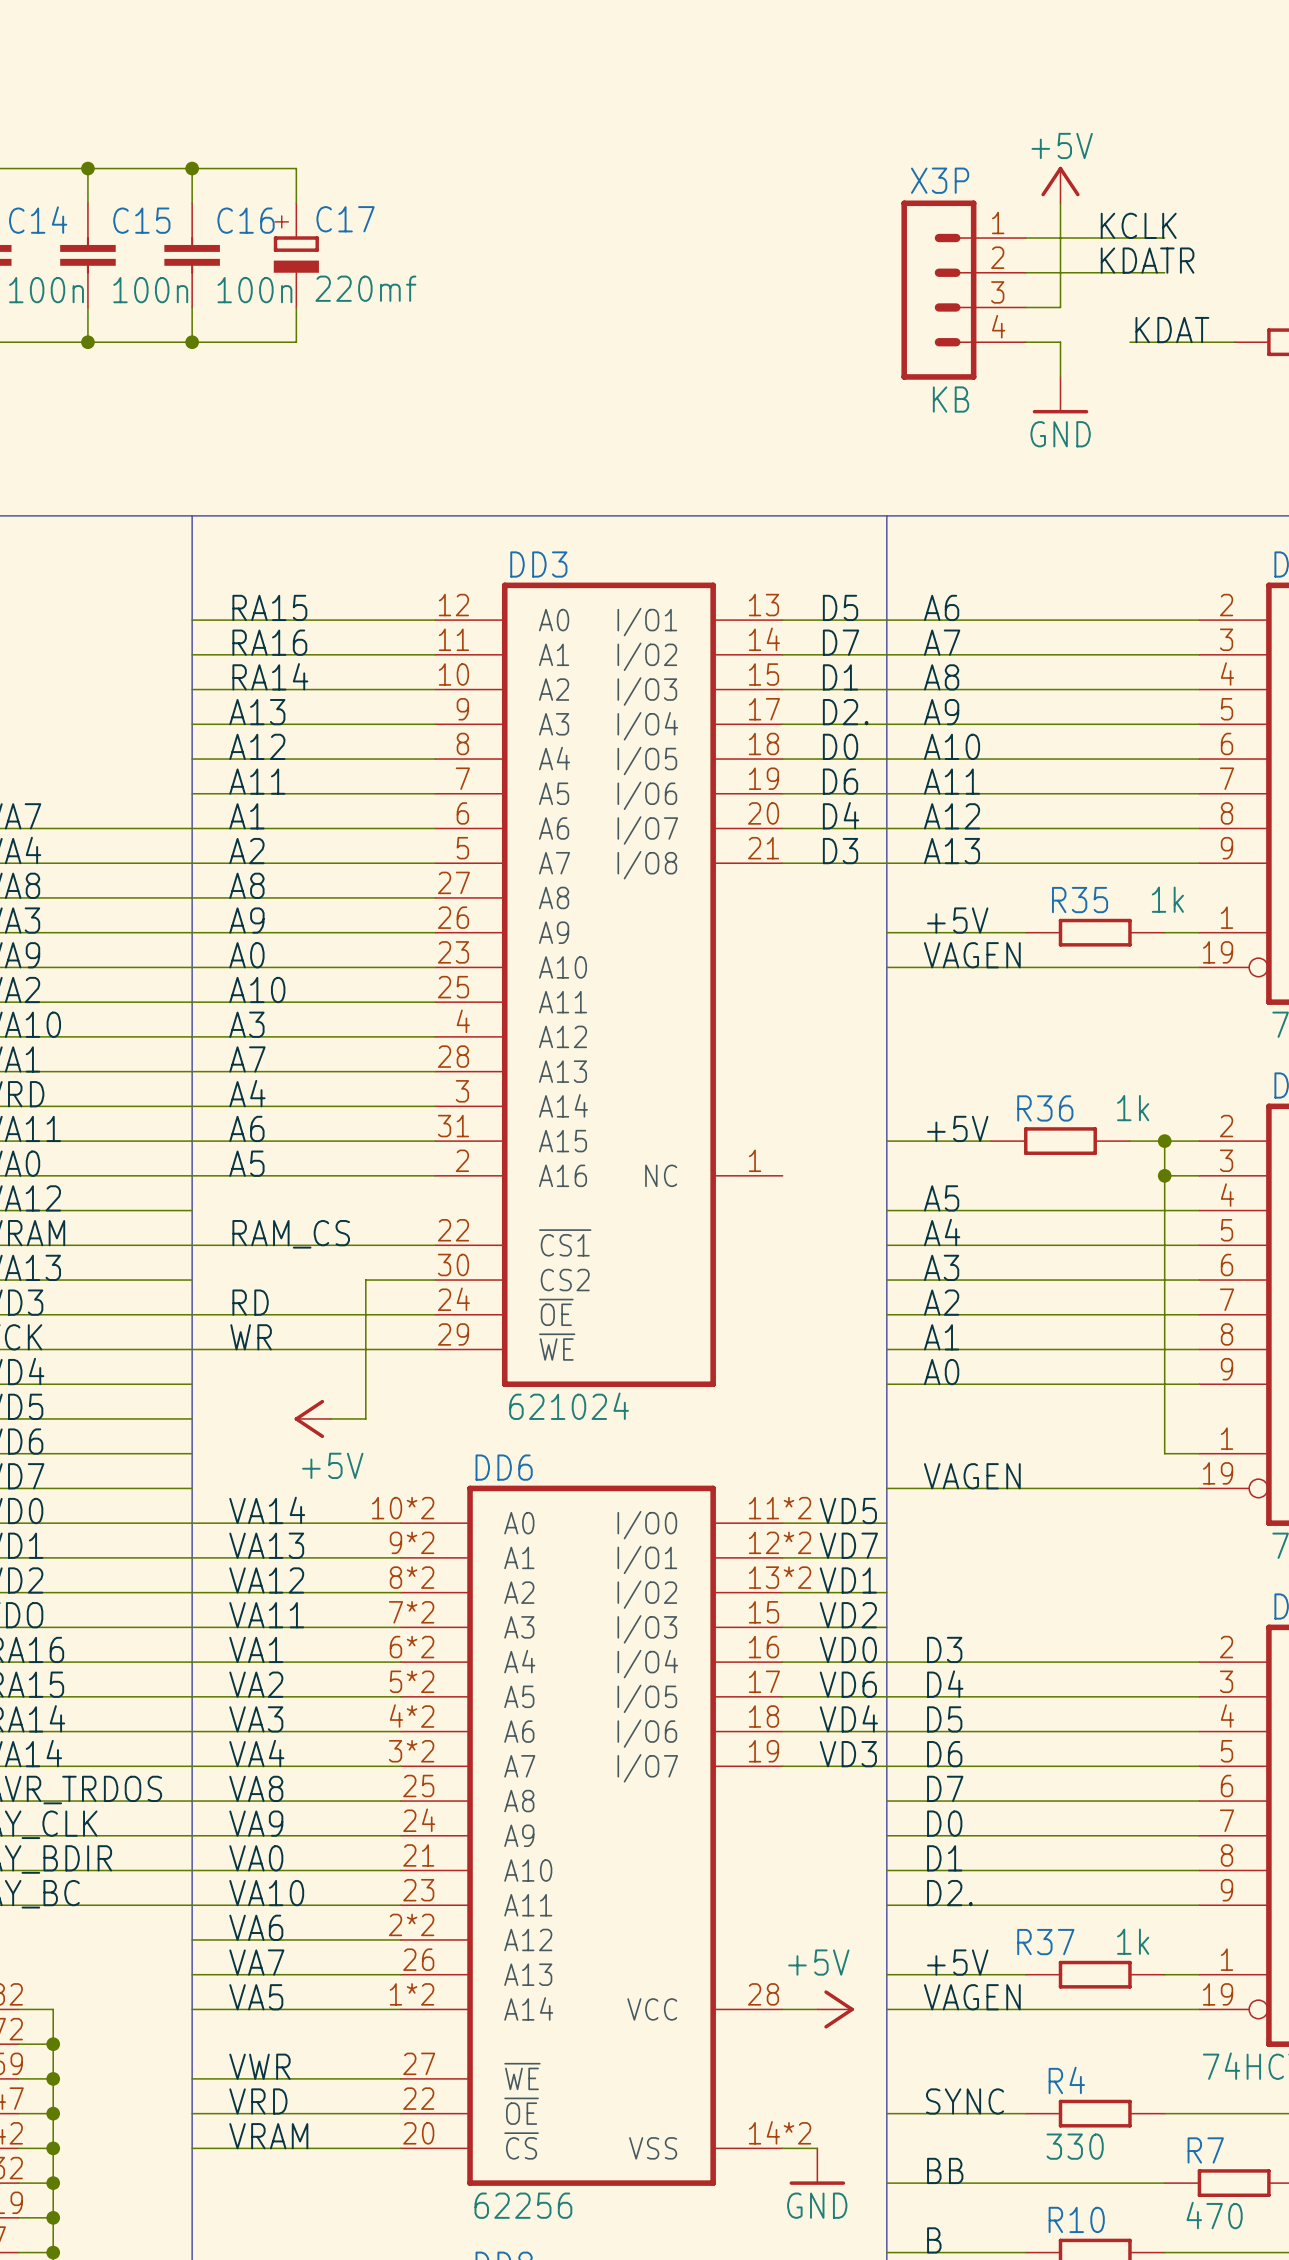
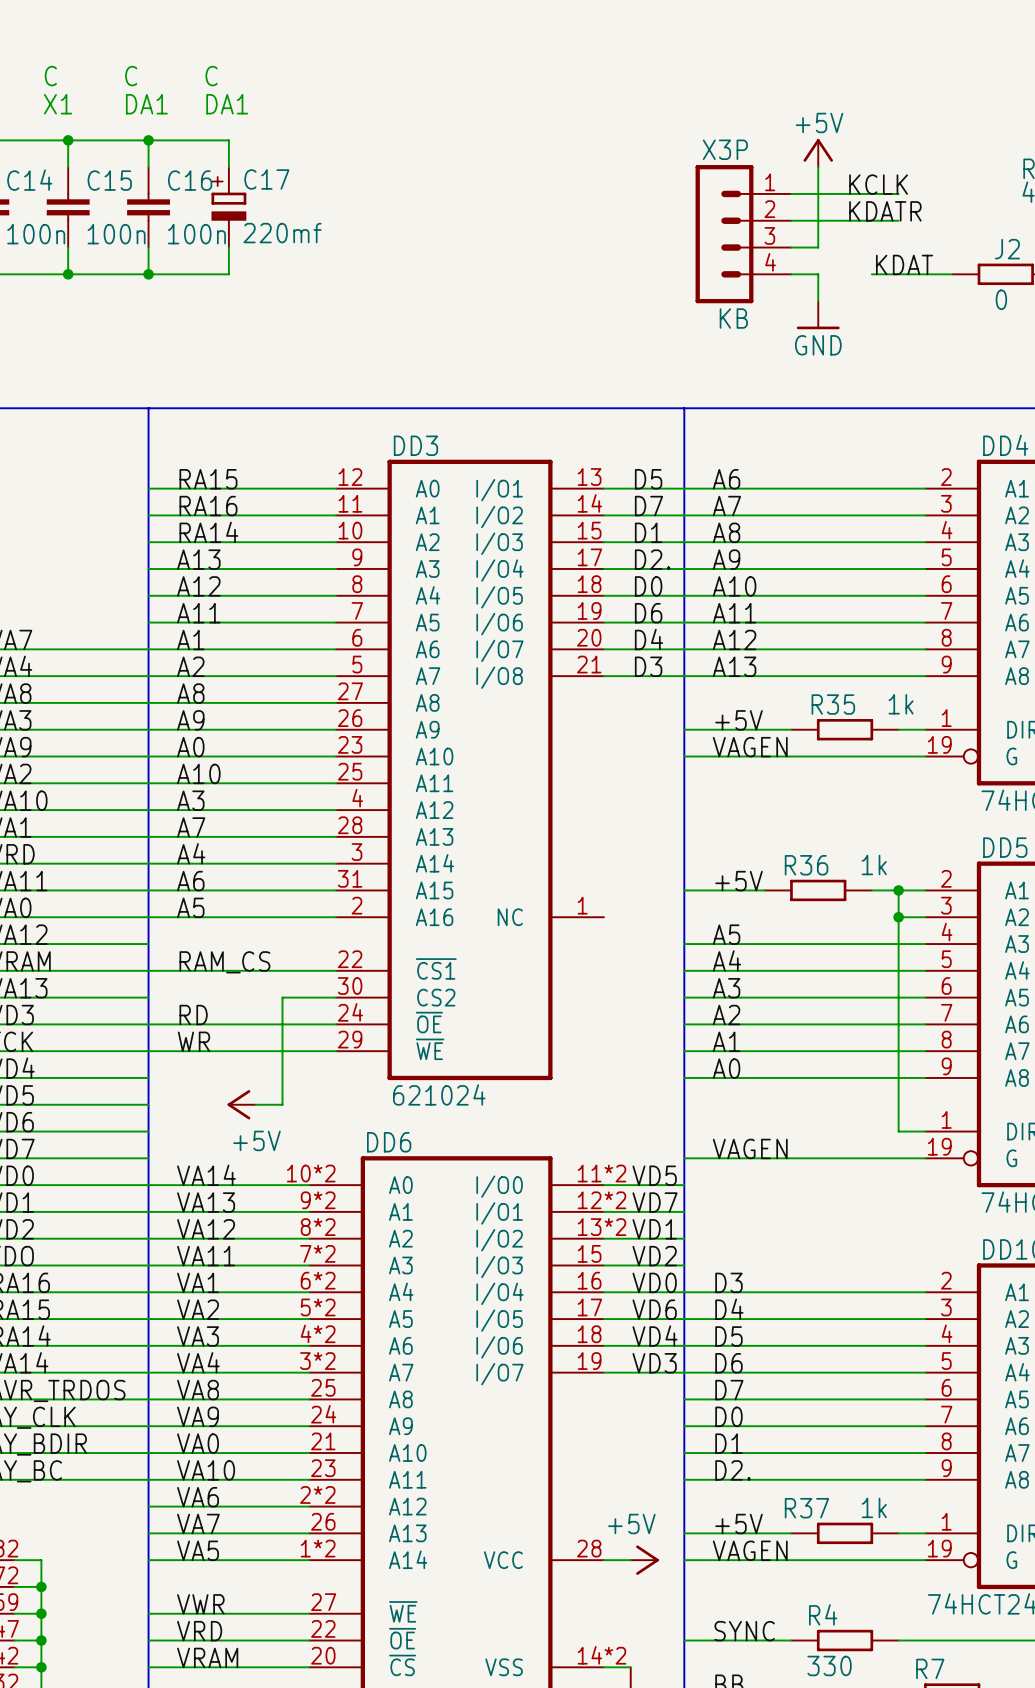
text: none -> C (50, 76)
text: none -> C (131, 76)
text: none -> C (211, 76)
text: none -> X1 (58, 104)
text: none -> DA1 (146, 104)
text: none -> DA1 (227, 104)

